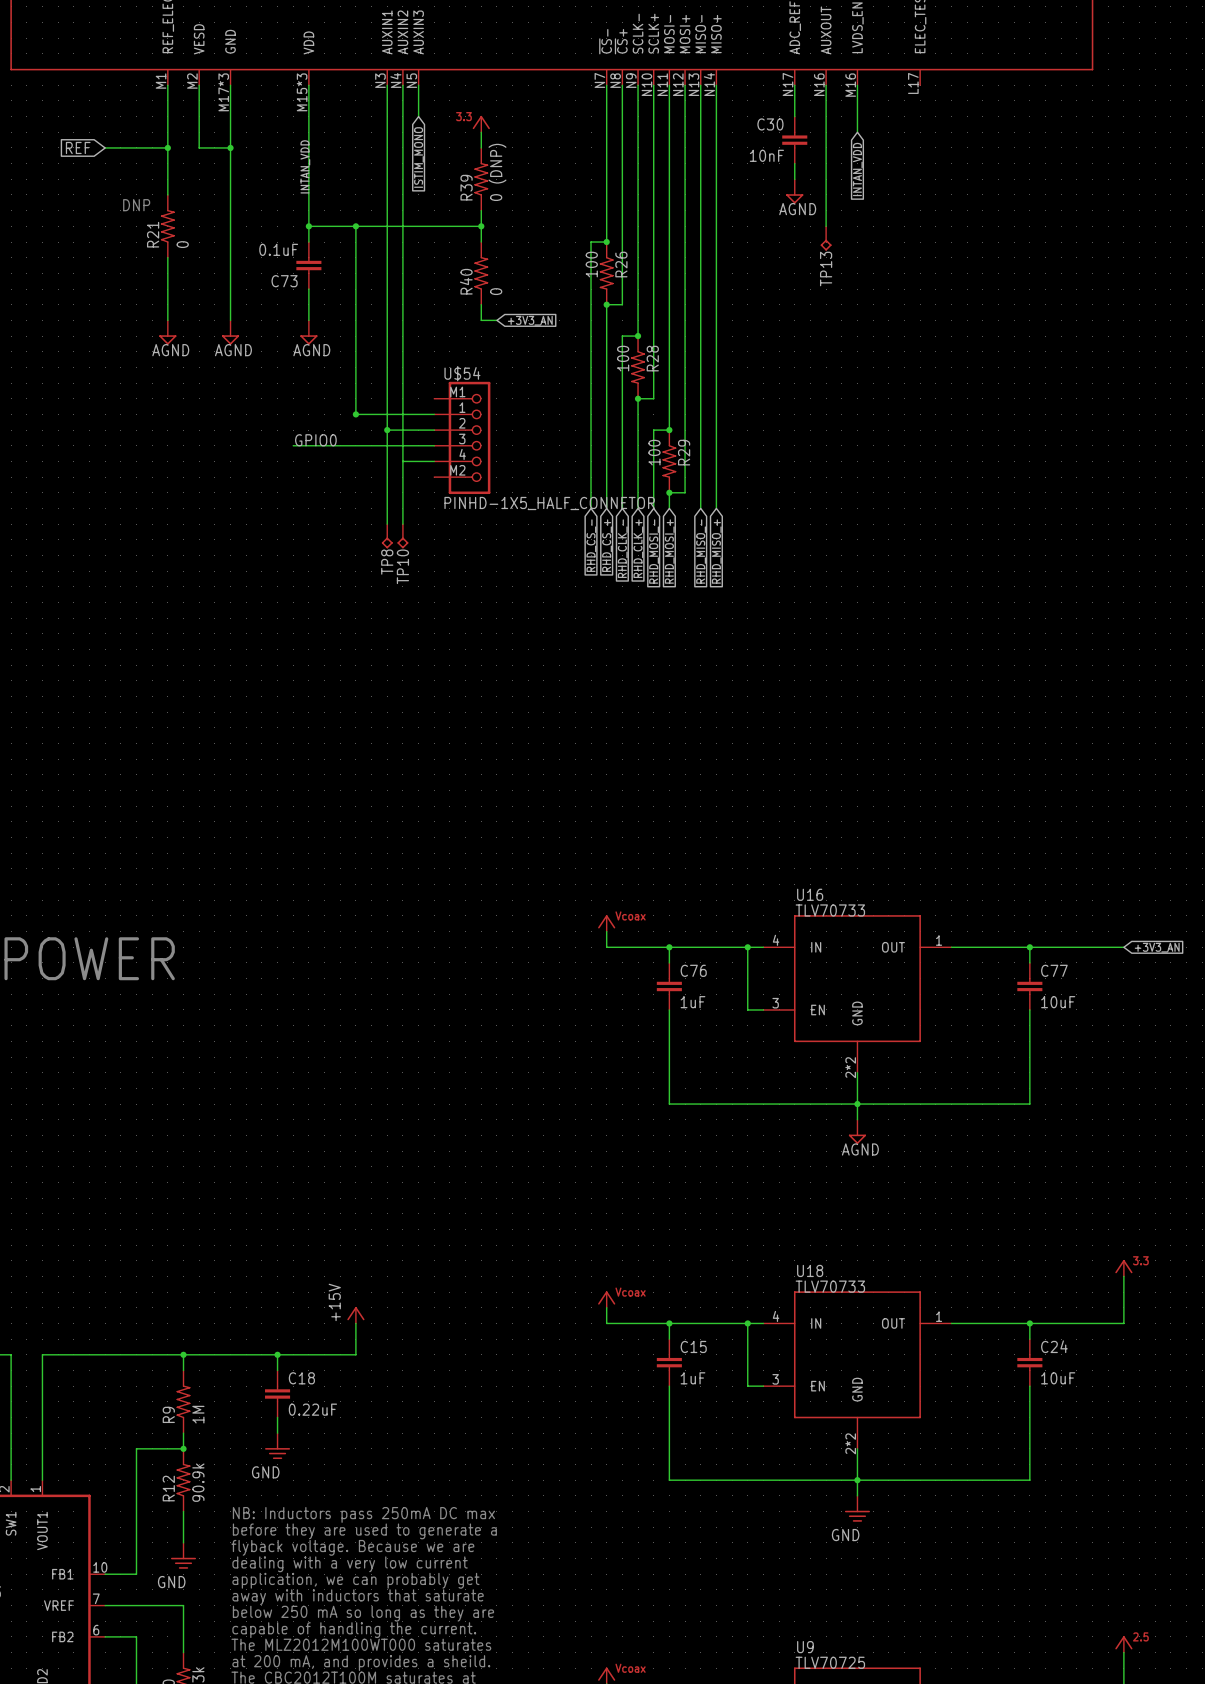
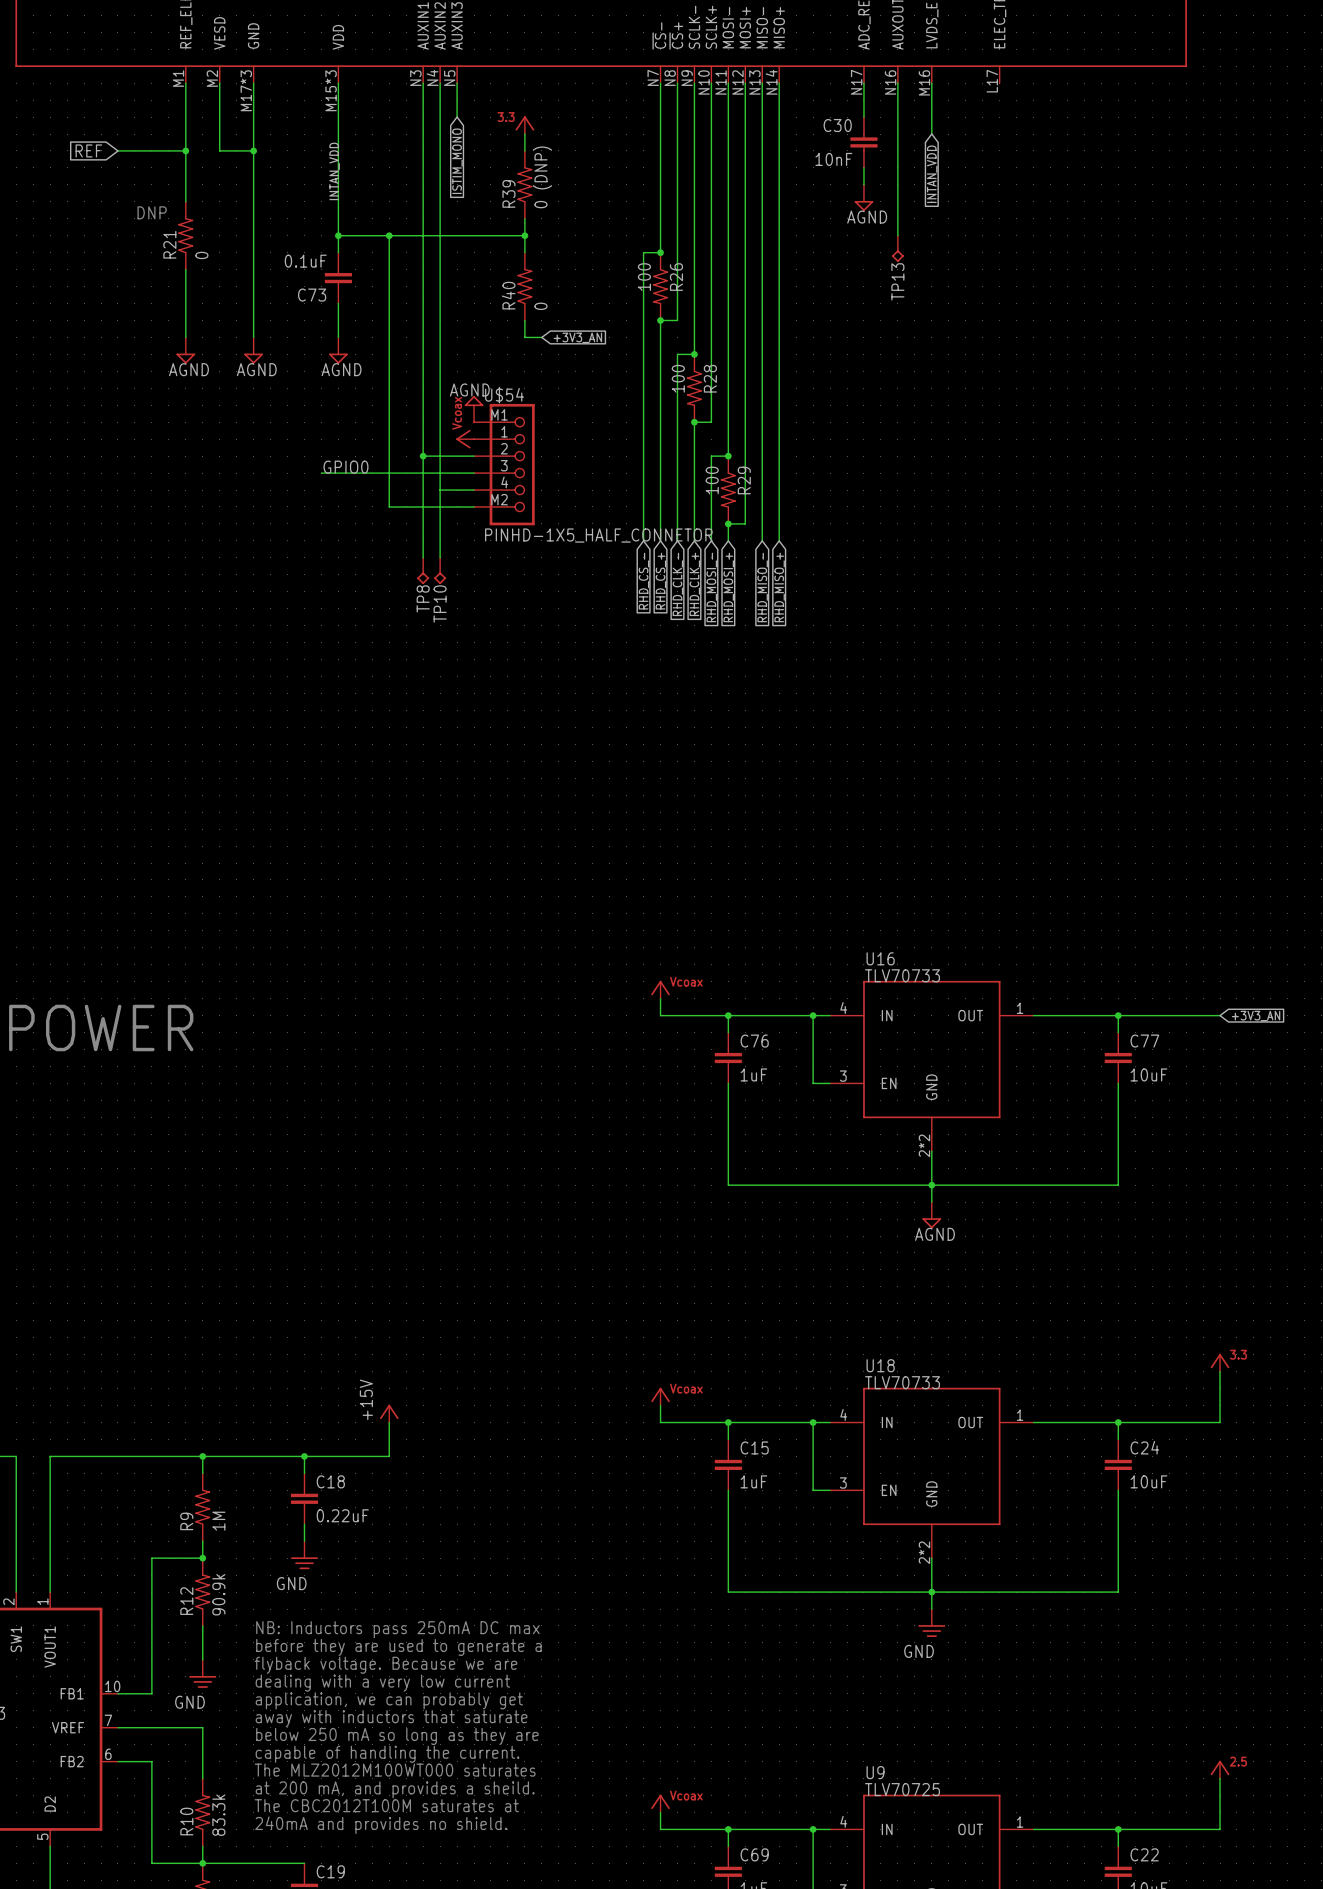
power symbol: none -> AGND (474, 409)
wire: (355, 414) (434, 414) -> (389, 439) (389, 506) (474, 506)
junction: (355, 414) -> none
power symbol: none -> (465, 439)

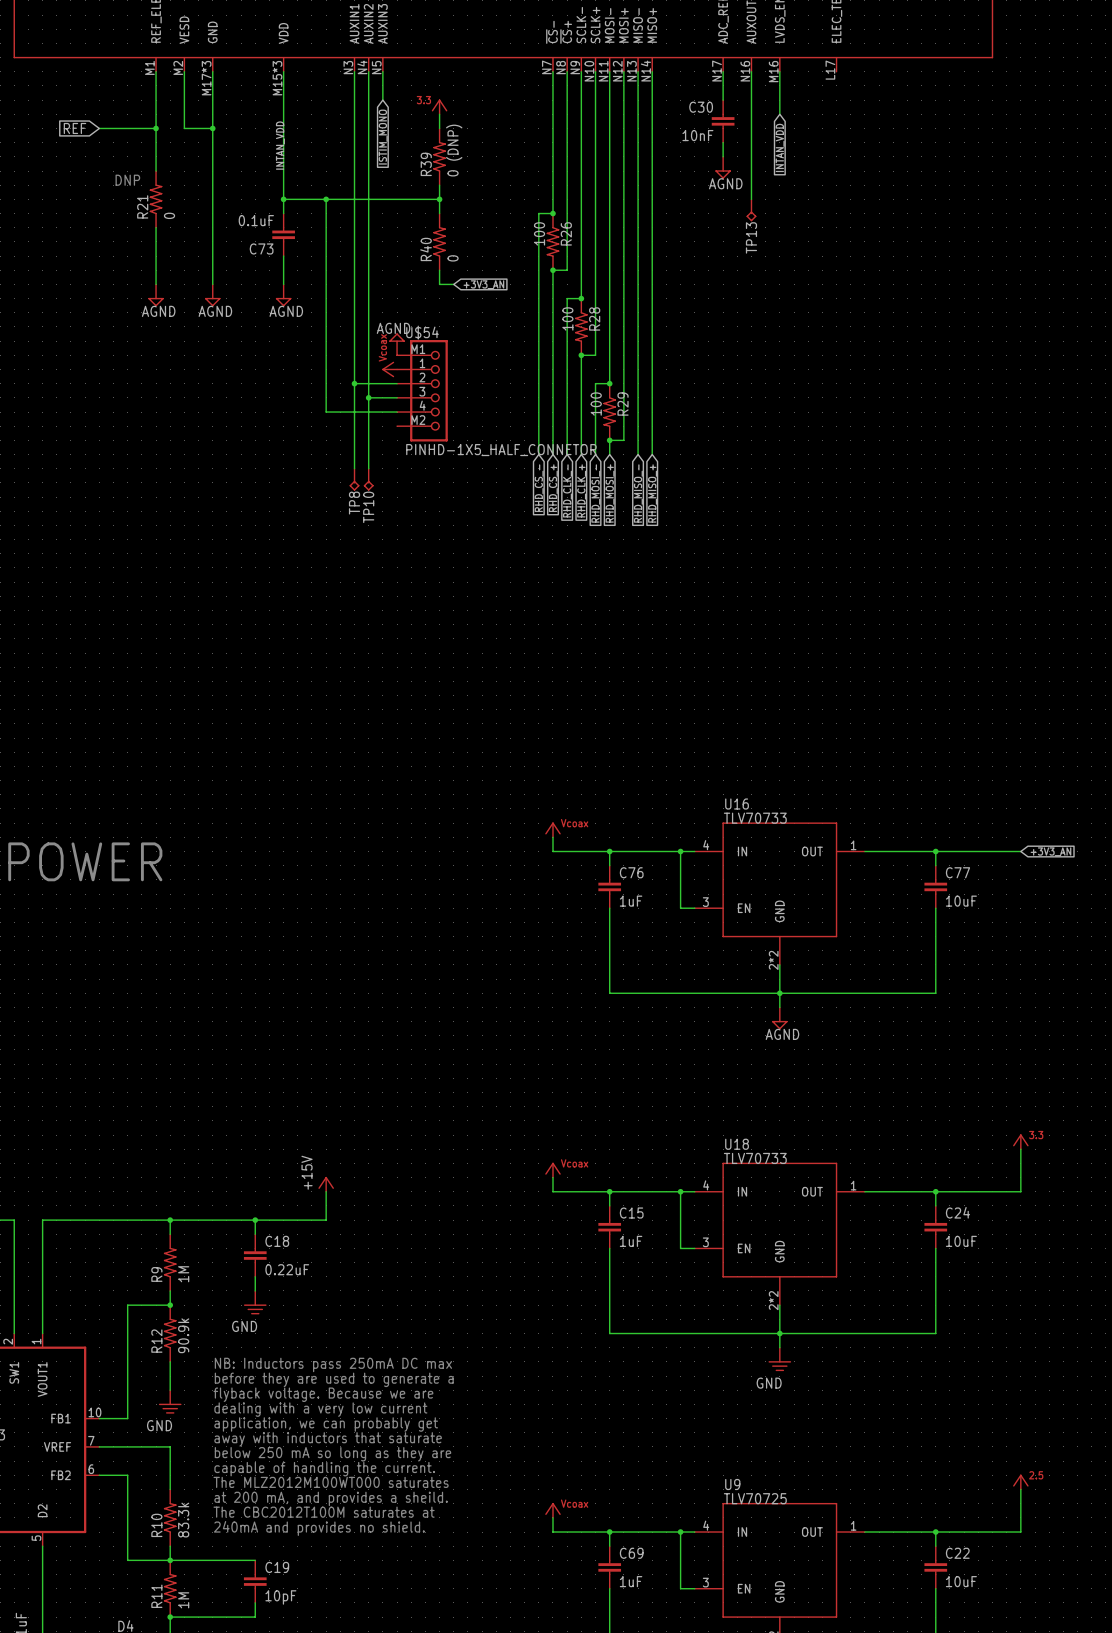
label: GPIO0 (345, 467) -> none
wire: (321, 473) (440, 473) -> none
junction: none -> (368, 397)
wire: (389, 490) (389, 506) (474, 506) -> (326, 412) (368, 412)

